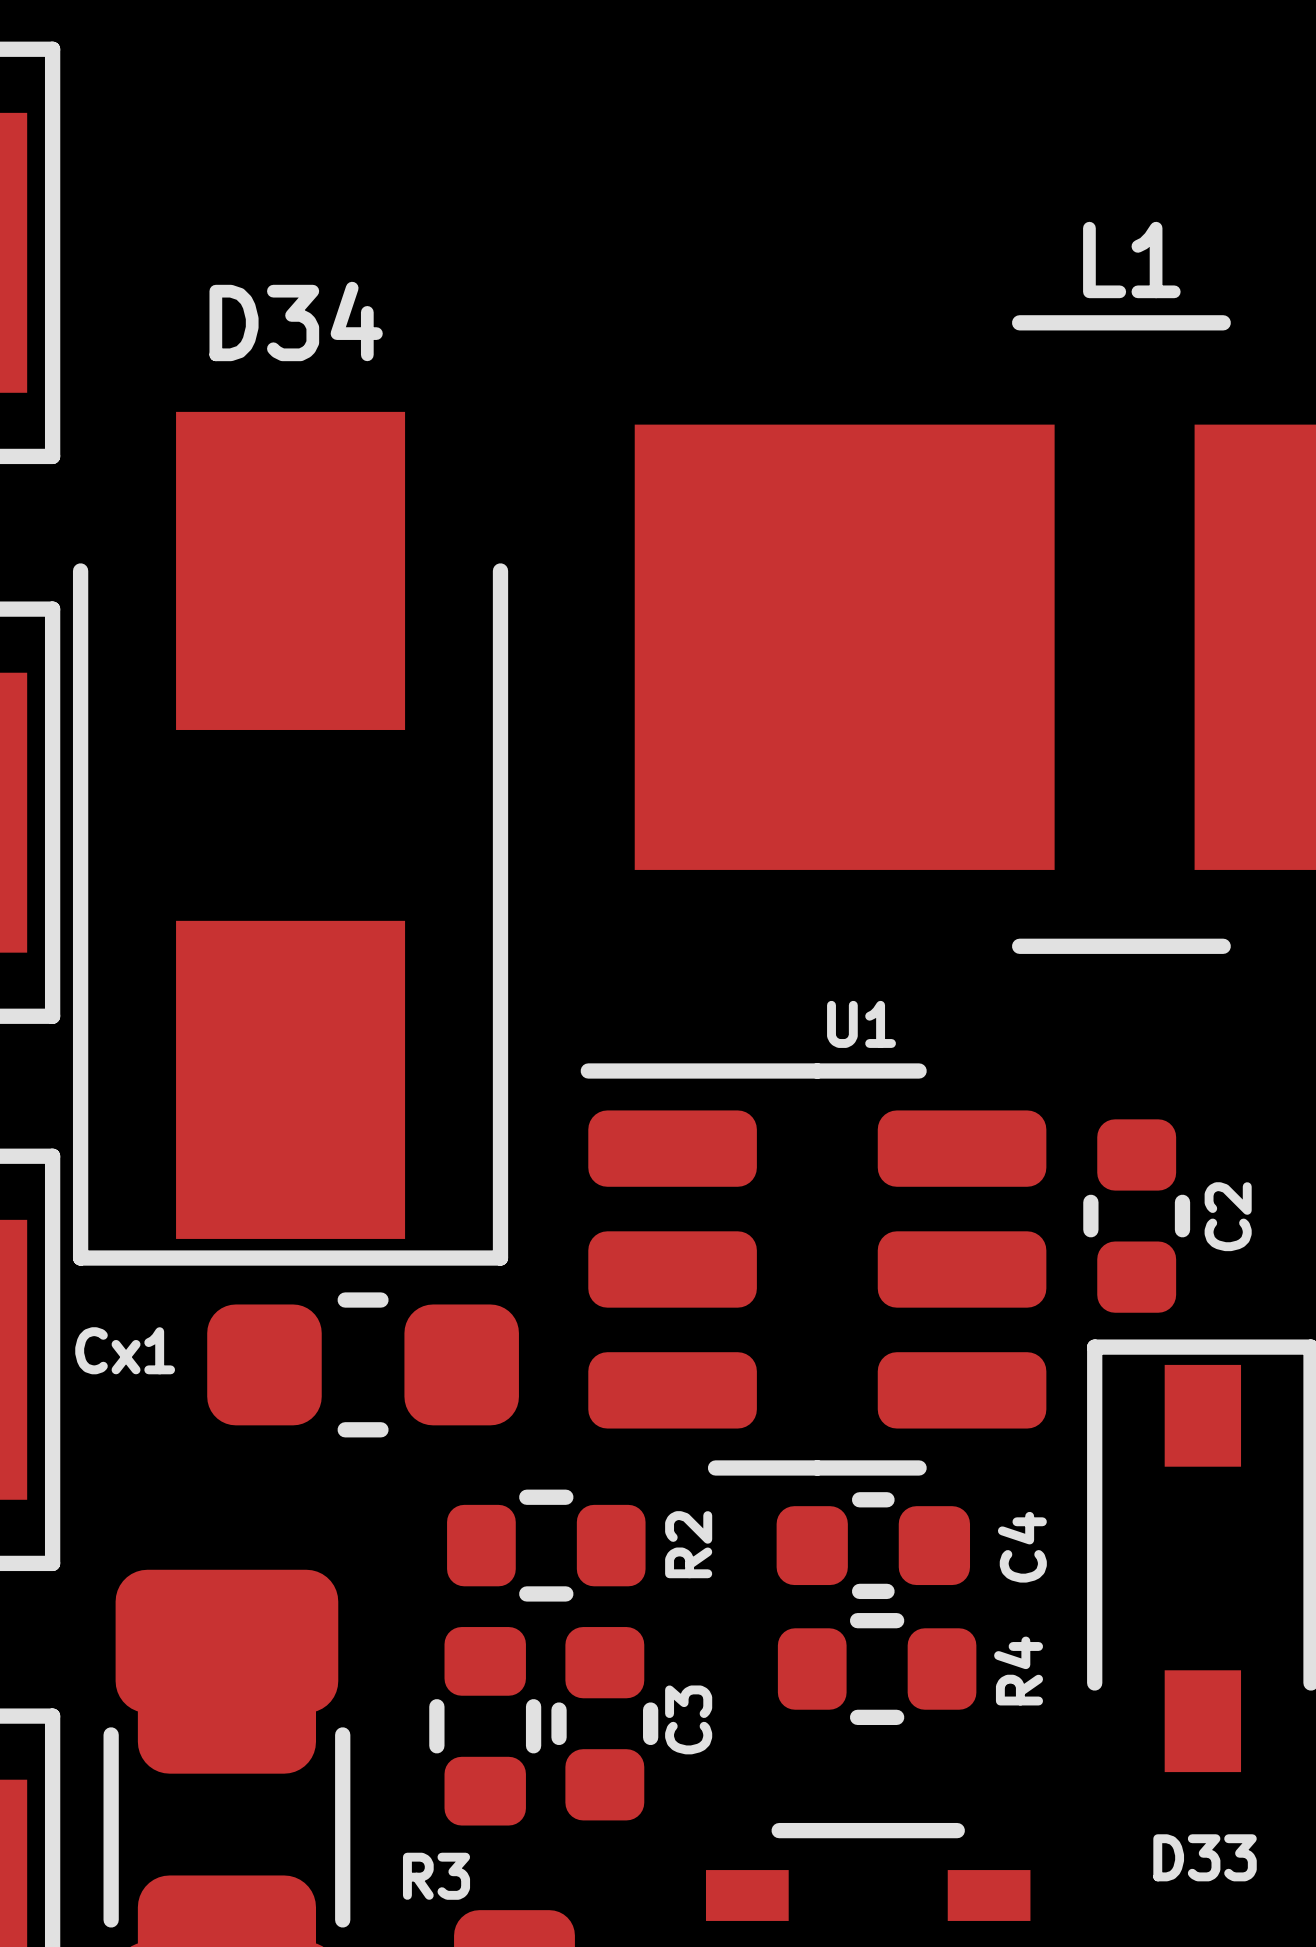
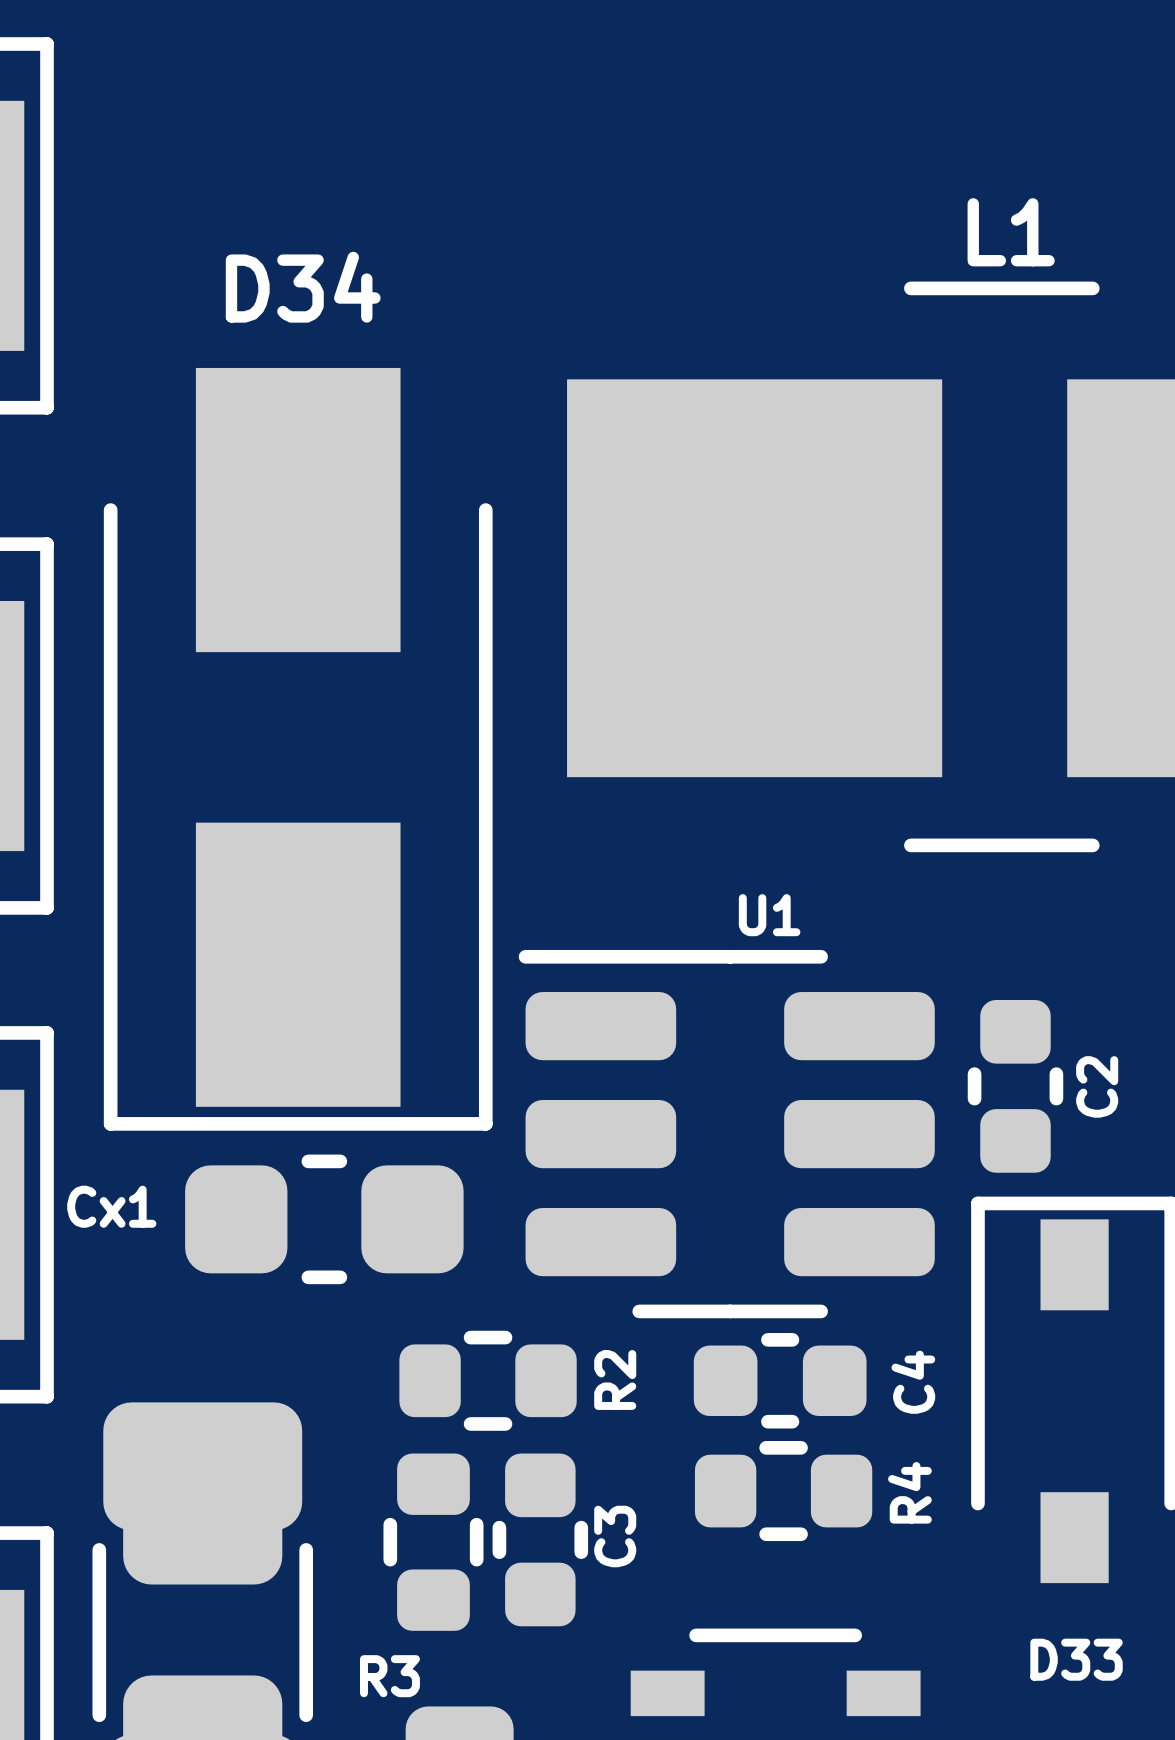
D34 position: (290, 838) -> (298, 749)

